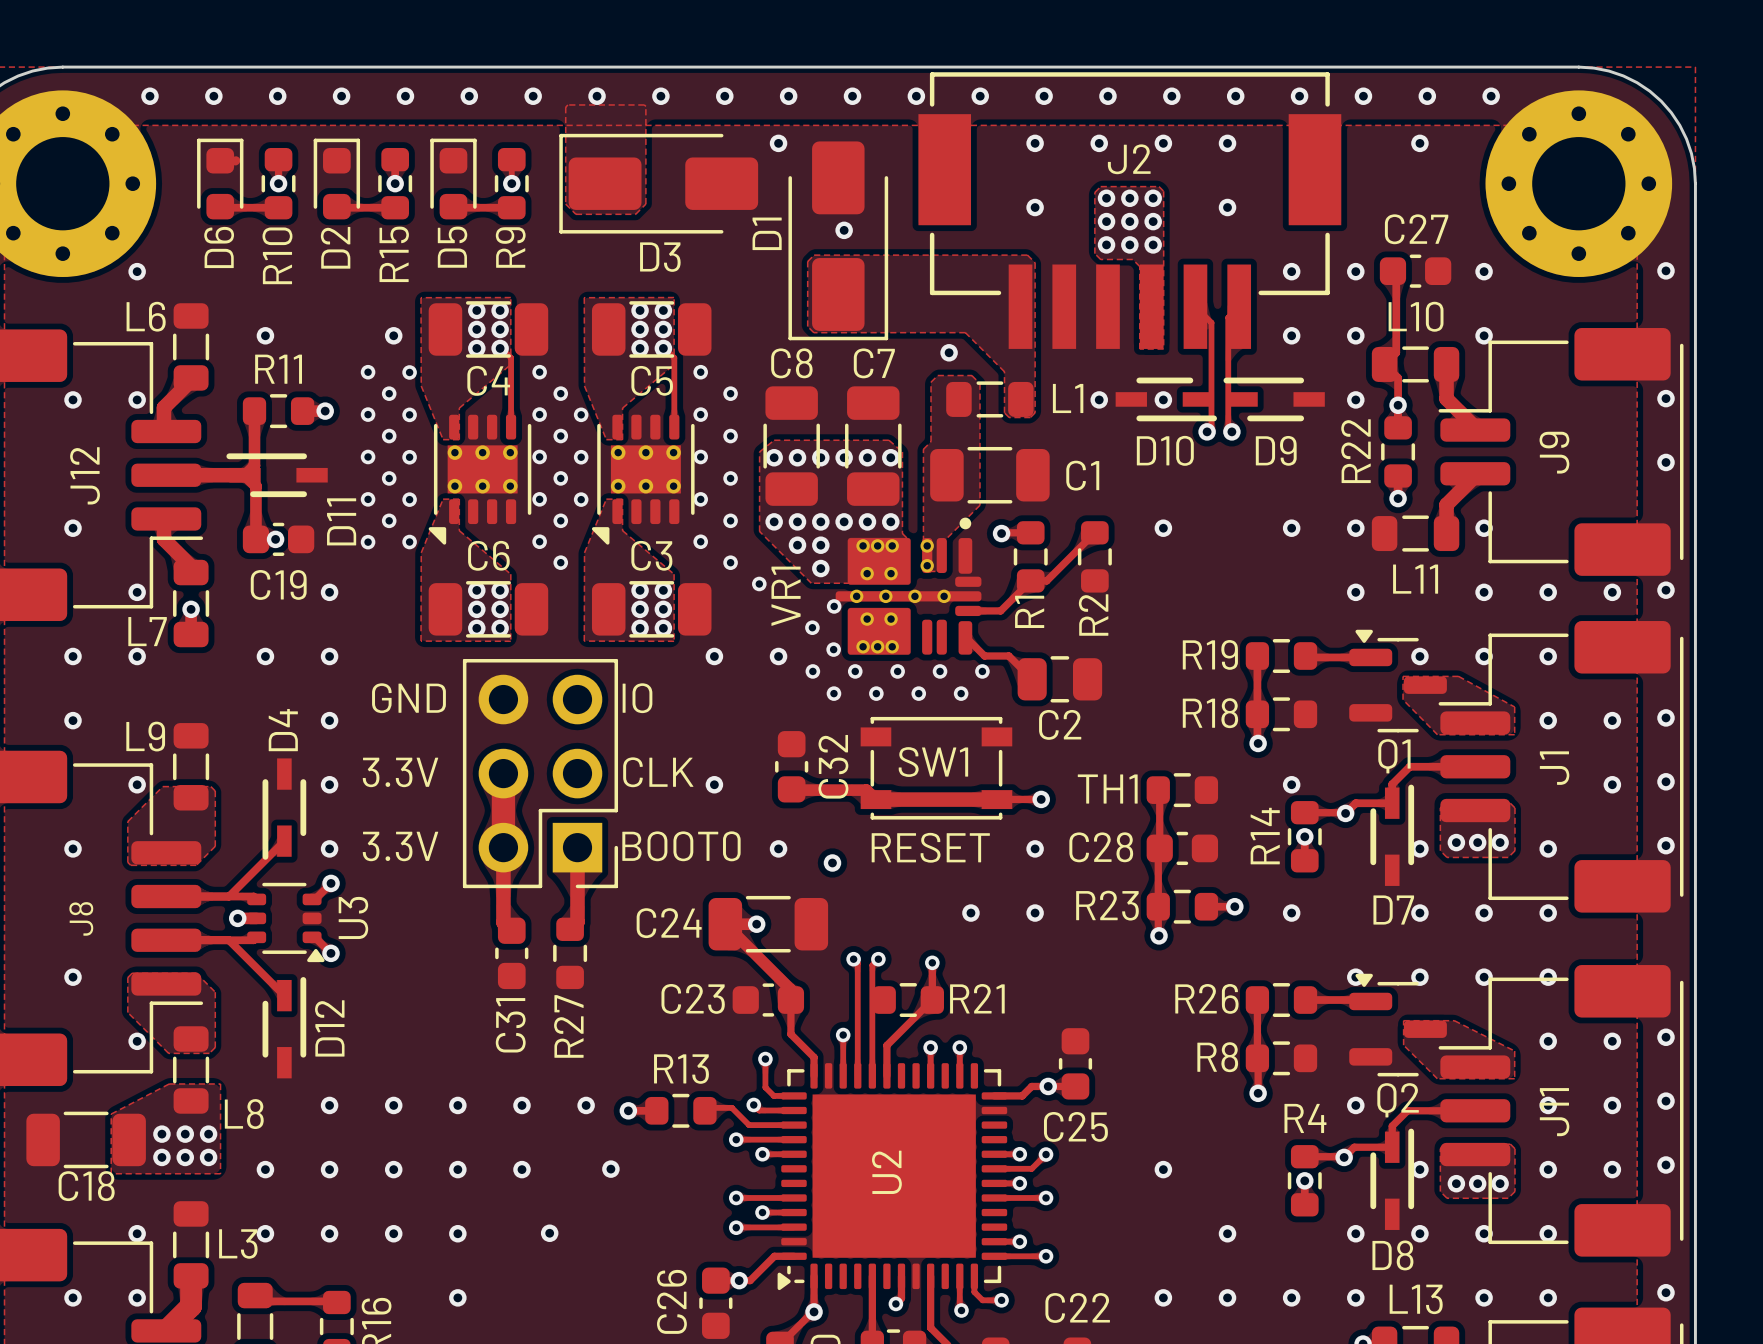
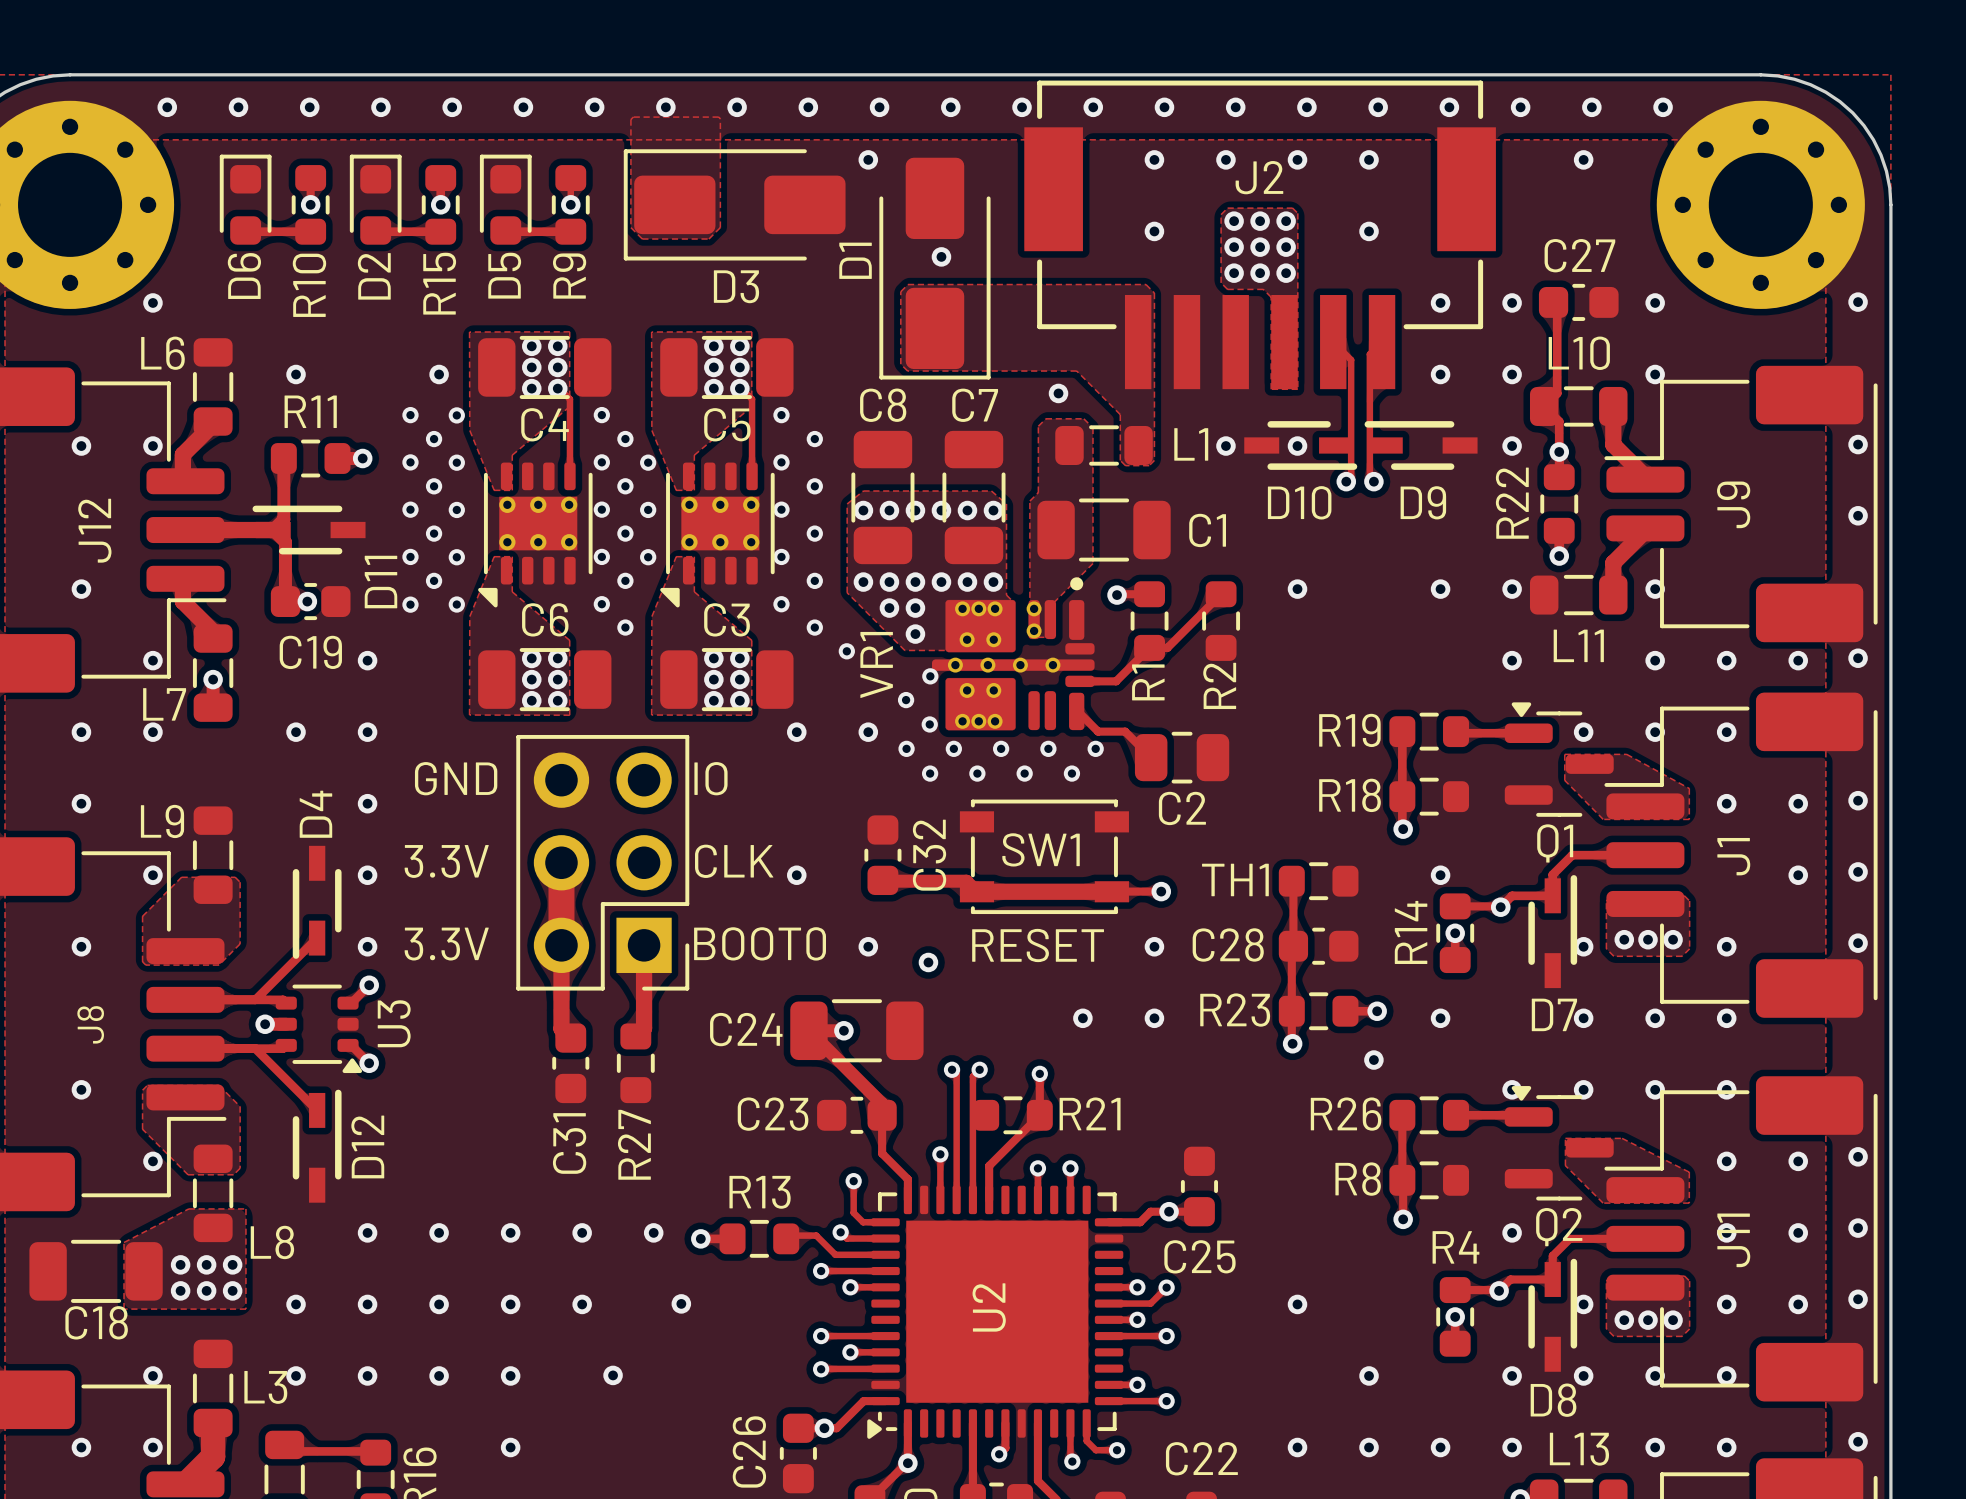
track: (235, 160) (235, 161) -> none
via: none -> (1373, 1060)

